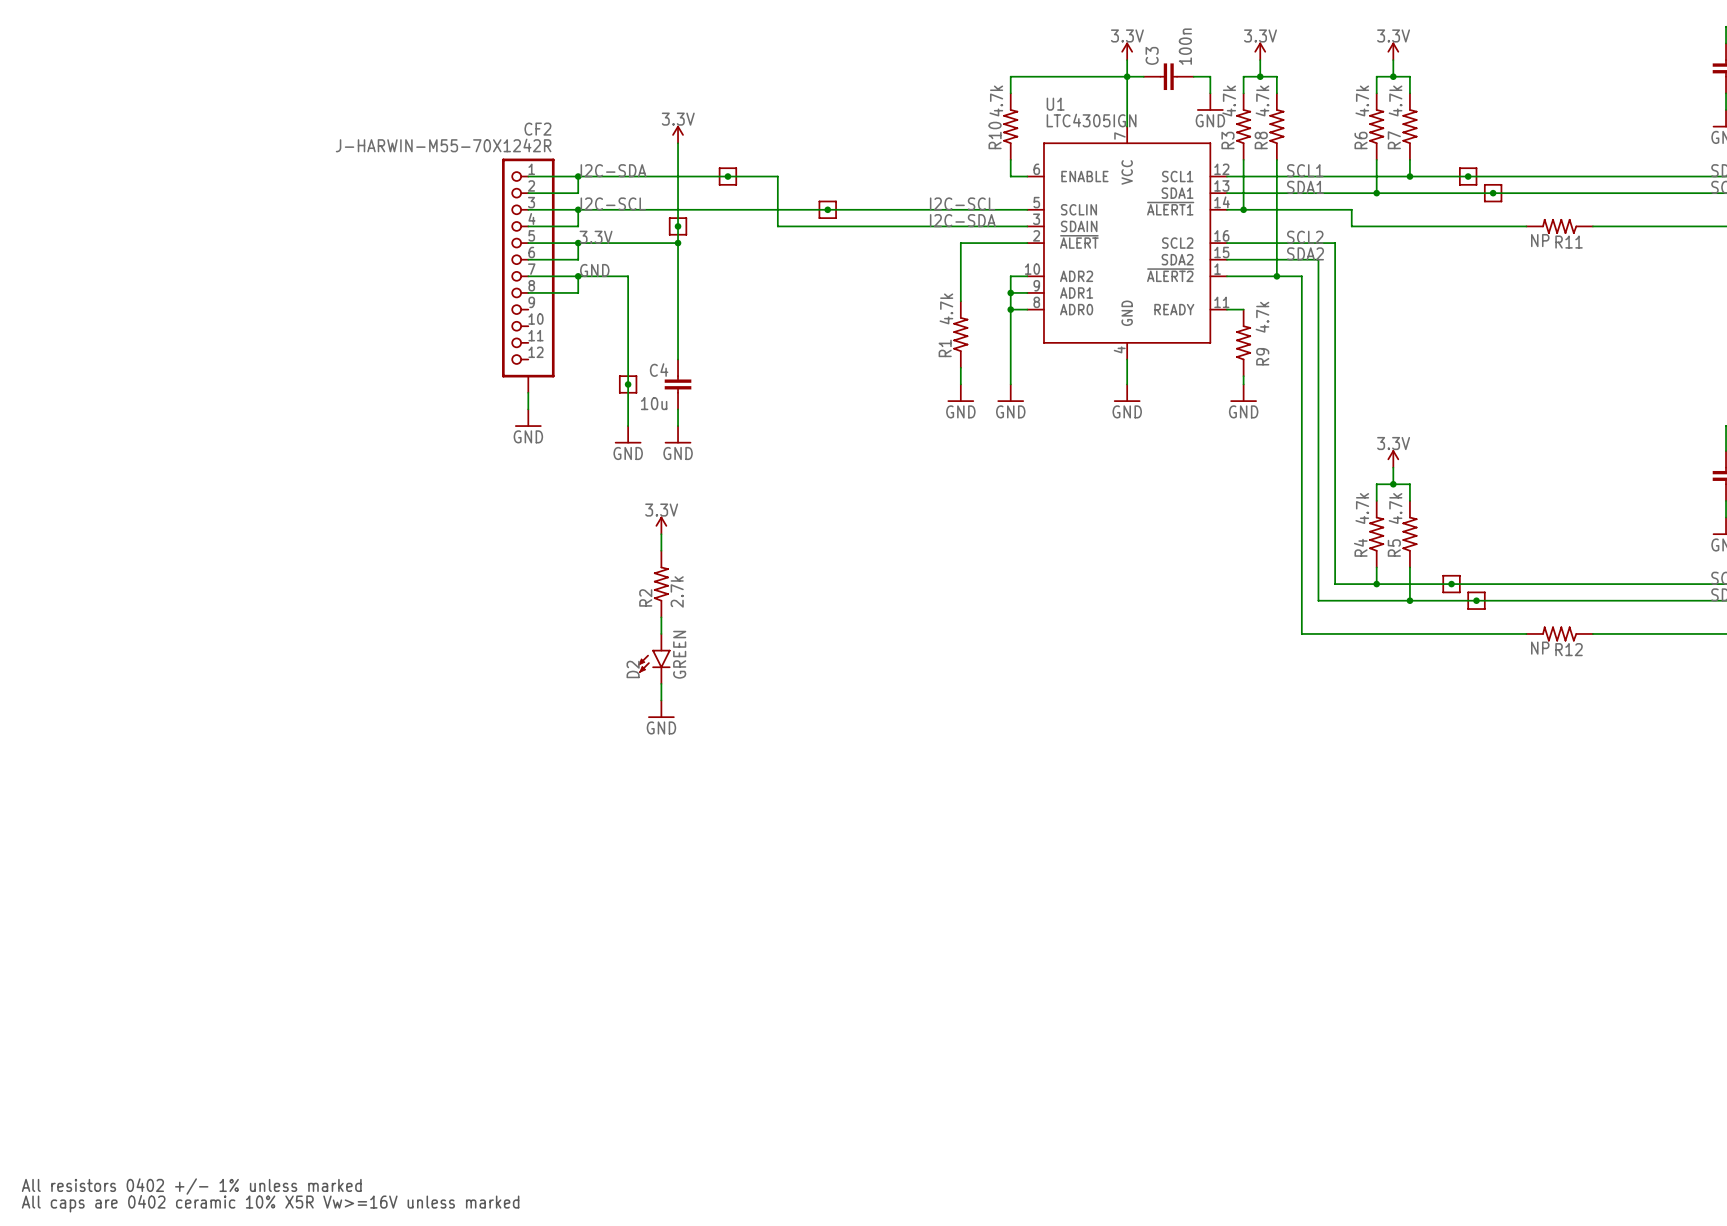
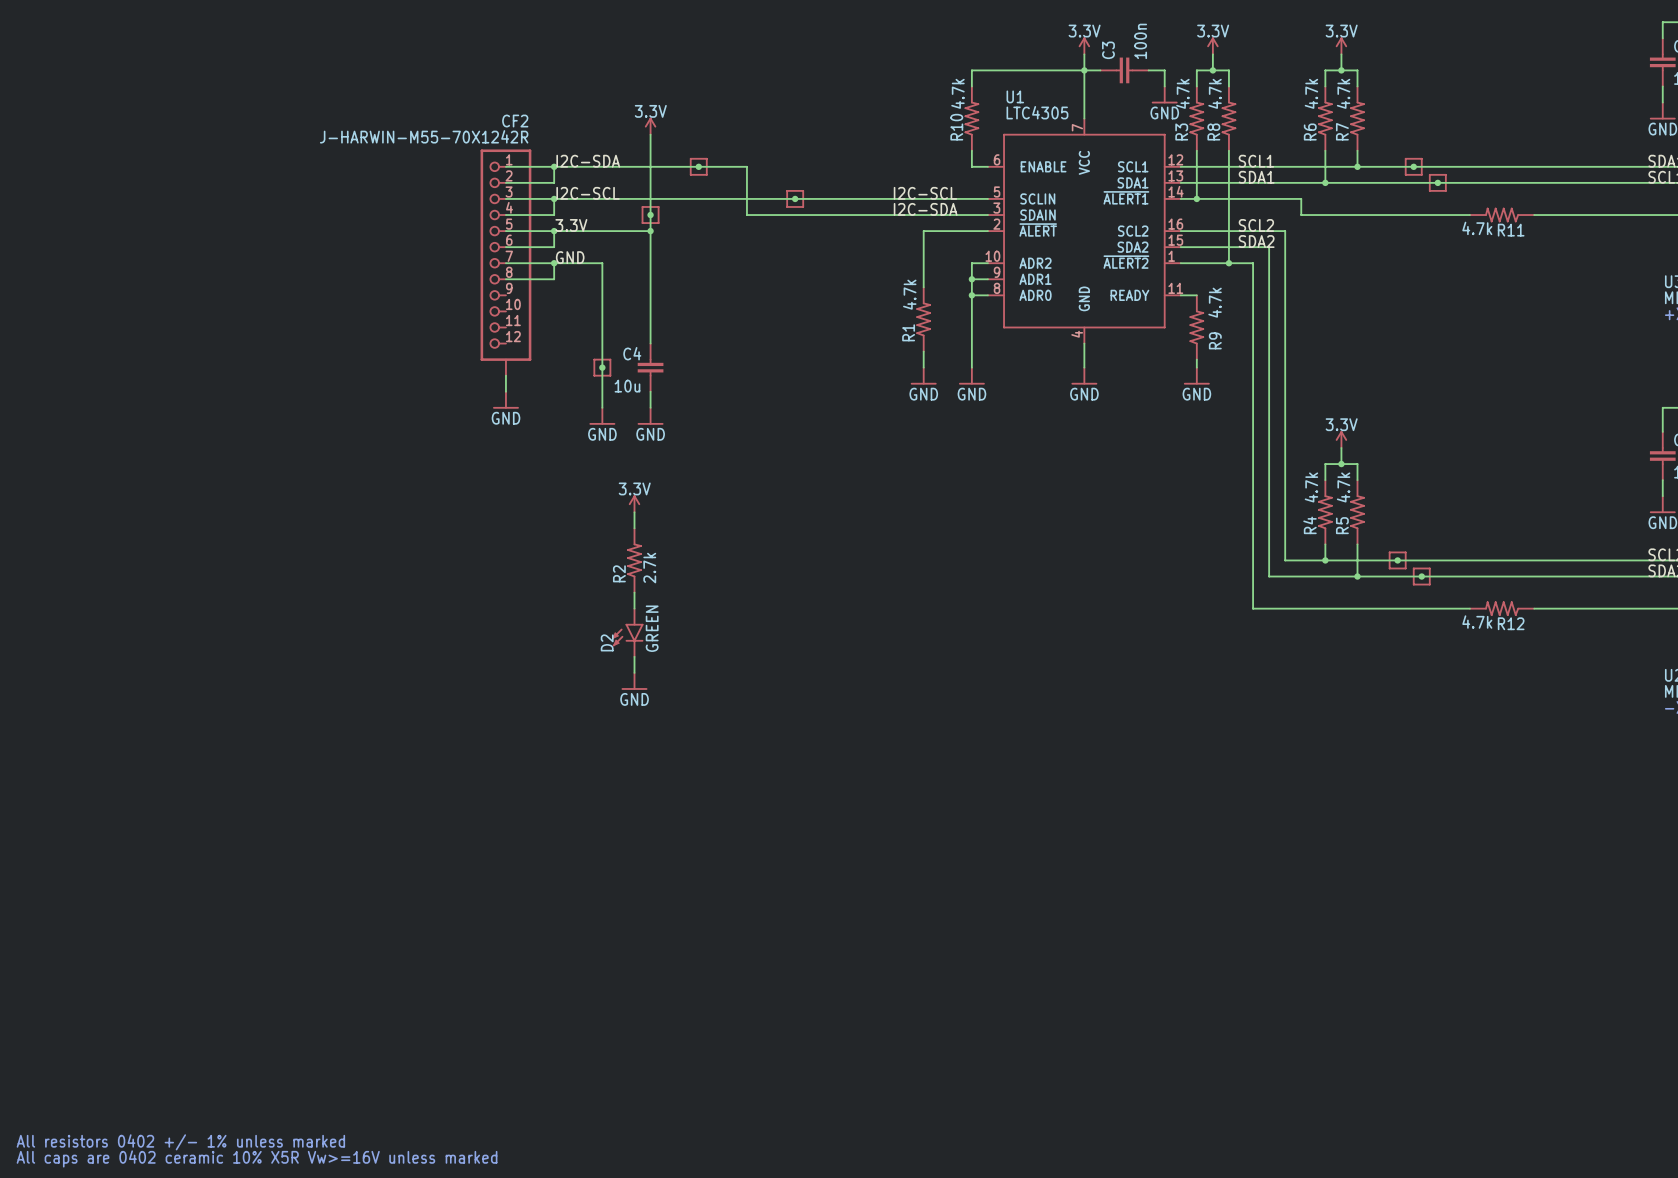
U1 value: LTC4305IGN (1091, 120) -> LTC4305 (1037, 112)
R11 value: NP (1540, 240) -> 4.7k (1477, 228)
R12 value: NP (1540, 648) -> 4.7k (1477, 622)

